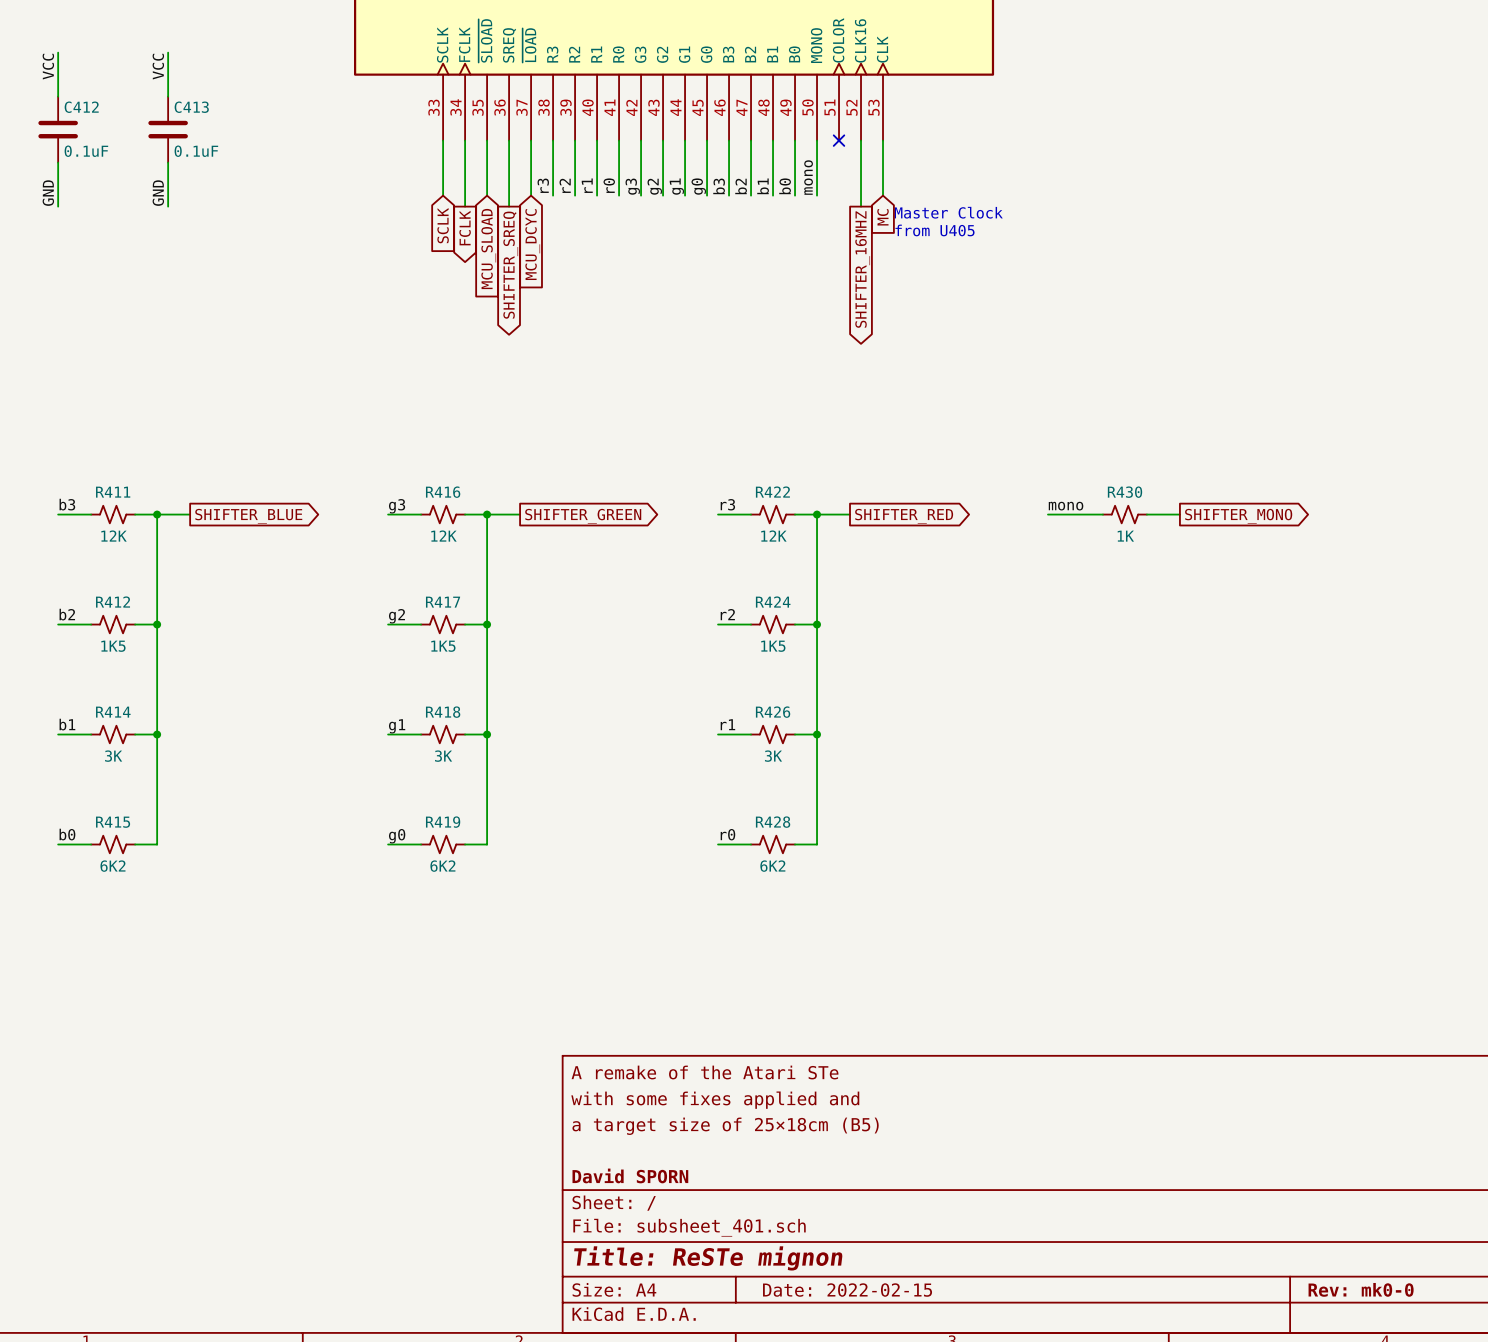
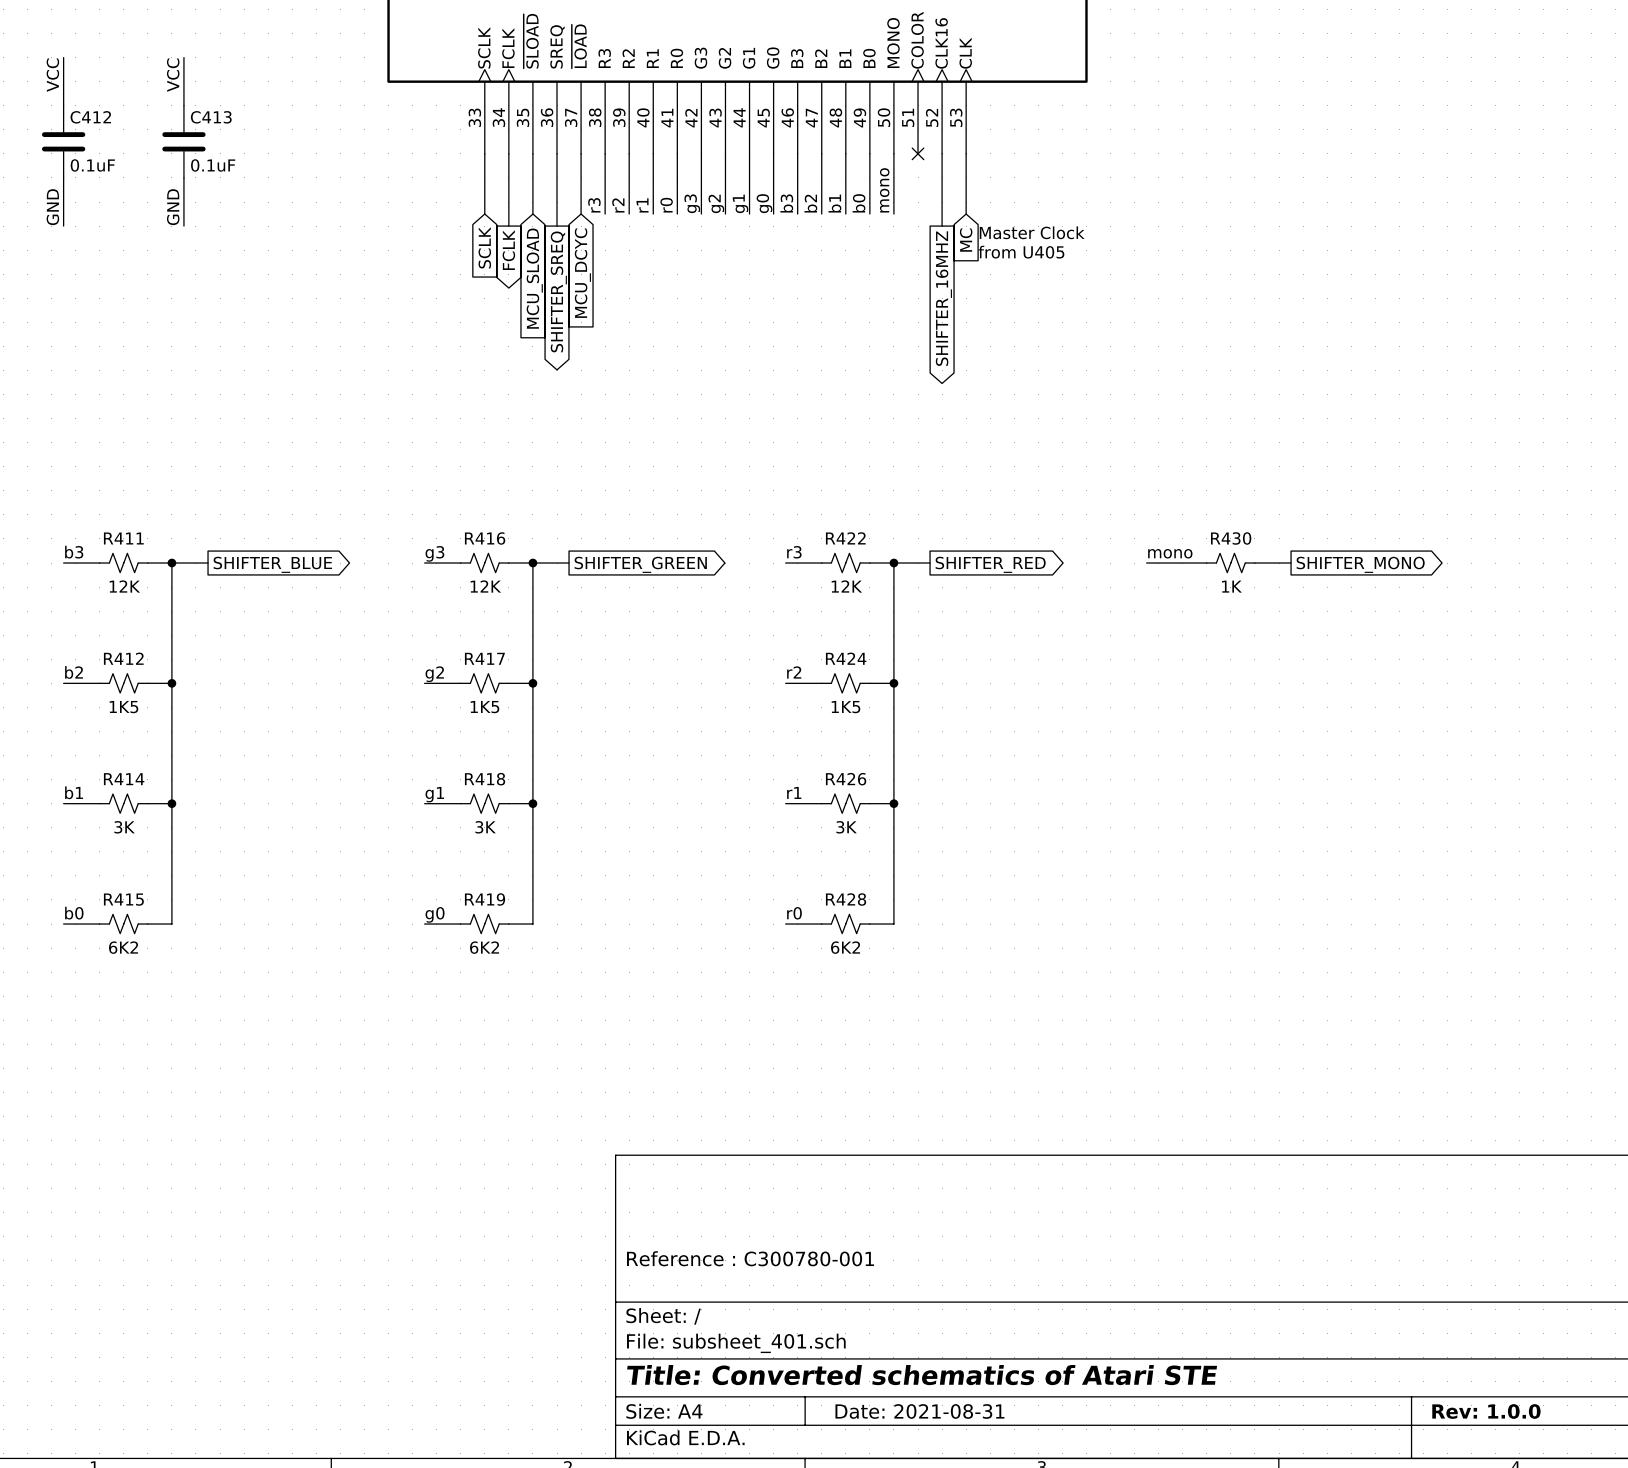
title block: A remake of the Atari STe (705, 1072) -> none
title block: with some fixes applied and (715, 1100) -> none
title block: a target size of 25×18cm (B5) (725, 1126) -> none
title block: none -> Reference : C300780-001 (750, 1258)
title block: David SPORN (630, 1175) -> none
title block: Title: ReSTe mignon (708, 1258) -> Title: Converted schematics of Atari STE (922, 1375)
title block: Rev: mk0-0 (1361, 1289) -> Rev: 1.0.0 (1486, 1411)
title block: Date: 2022-02-15 (847, 1290) -> Date: 2021-08-31 (919, 1411)

